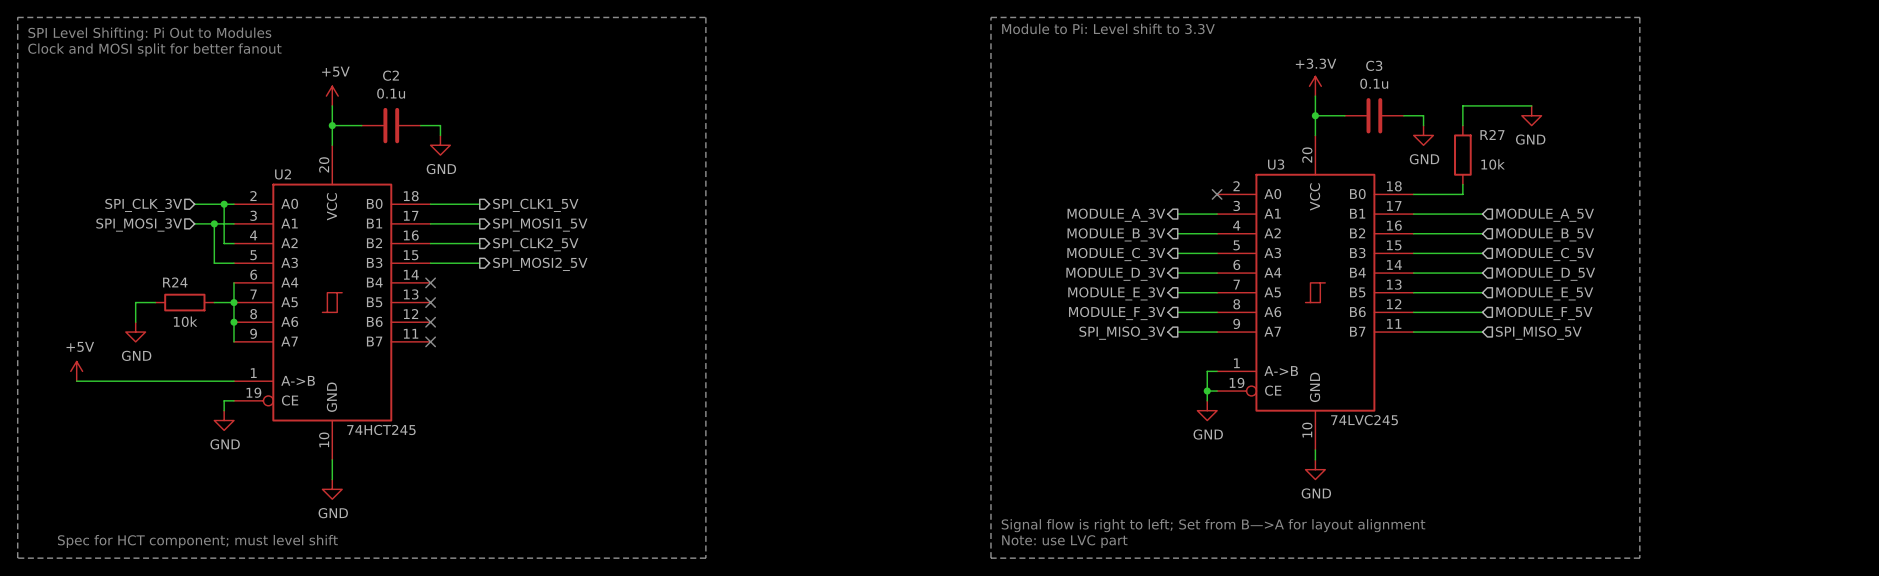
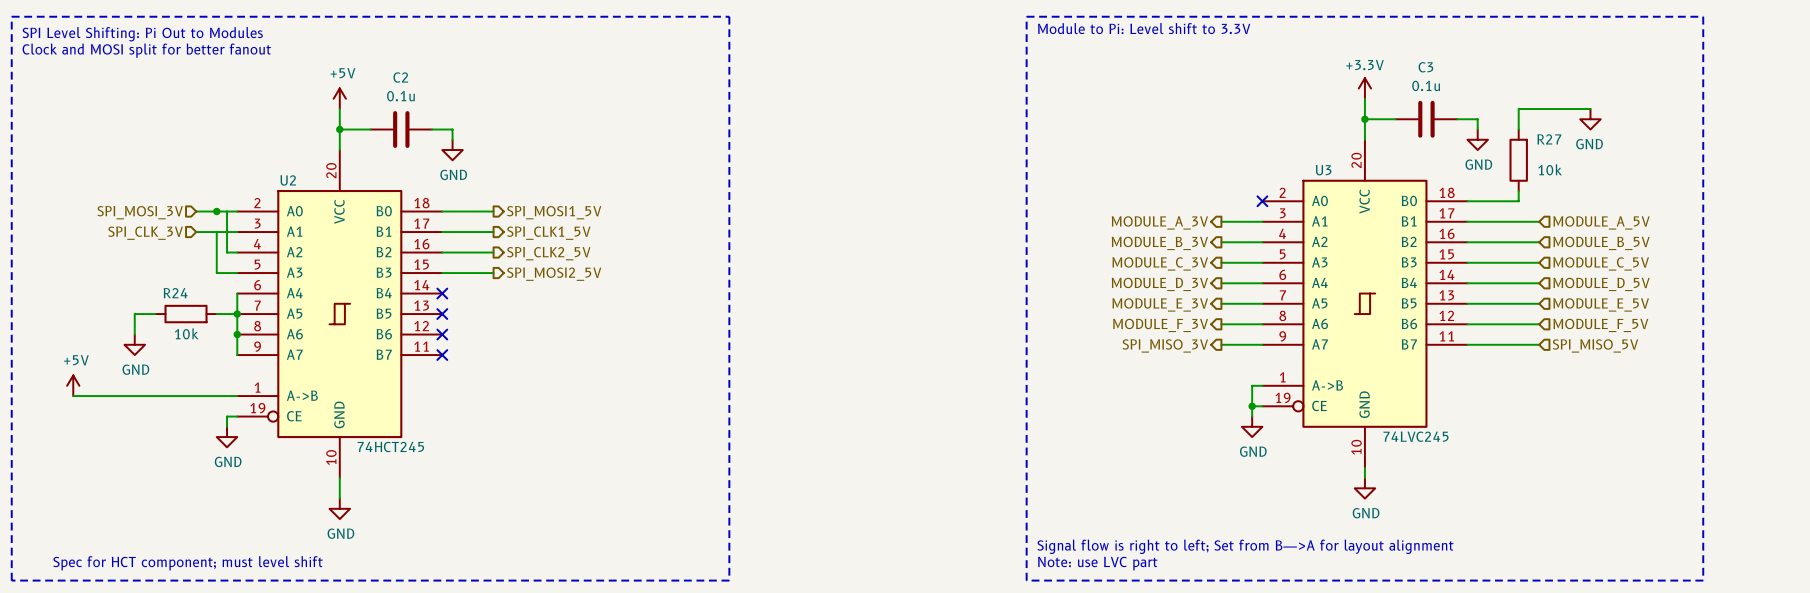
junction: none -> (216, 211)
junction: (224, 204) -> none
hierarchical label: SPI_CLK_3V (143, 205) -> SPI_MOSI_3V (140, 212)
hierarchical label: SPI_CLK1_5V (535, 205) -> SPI_MOSI1_5V (554, 212)
junction: (214, 223) -> none
hierarchical label: SPI_MOSI_3V (139, 225) -> SPI_CLK_3V (145, 233)
hierarchical label: SPI_MOSI1_5V (540, 225) -> SPI_CLK1_5V (548, 233)

